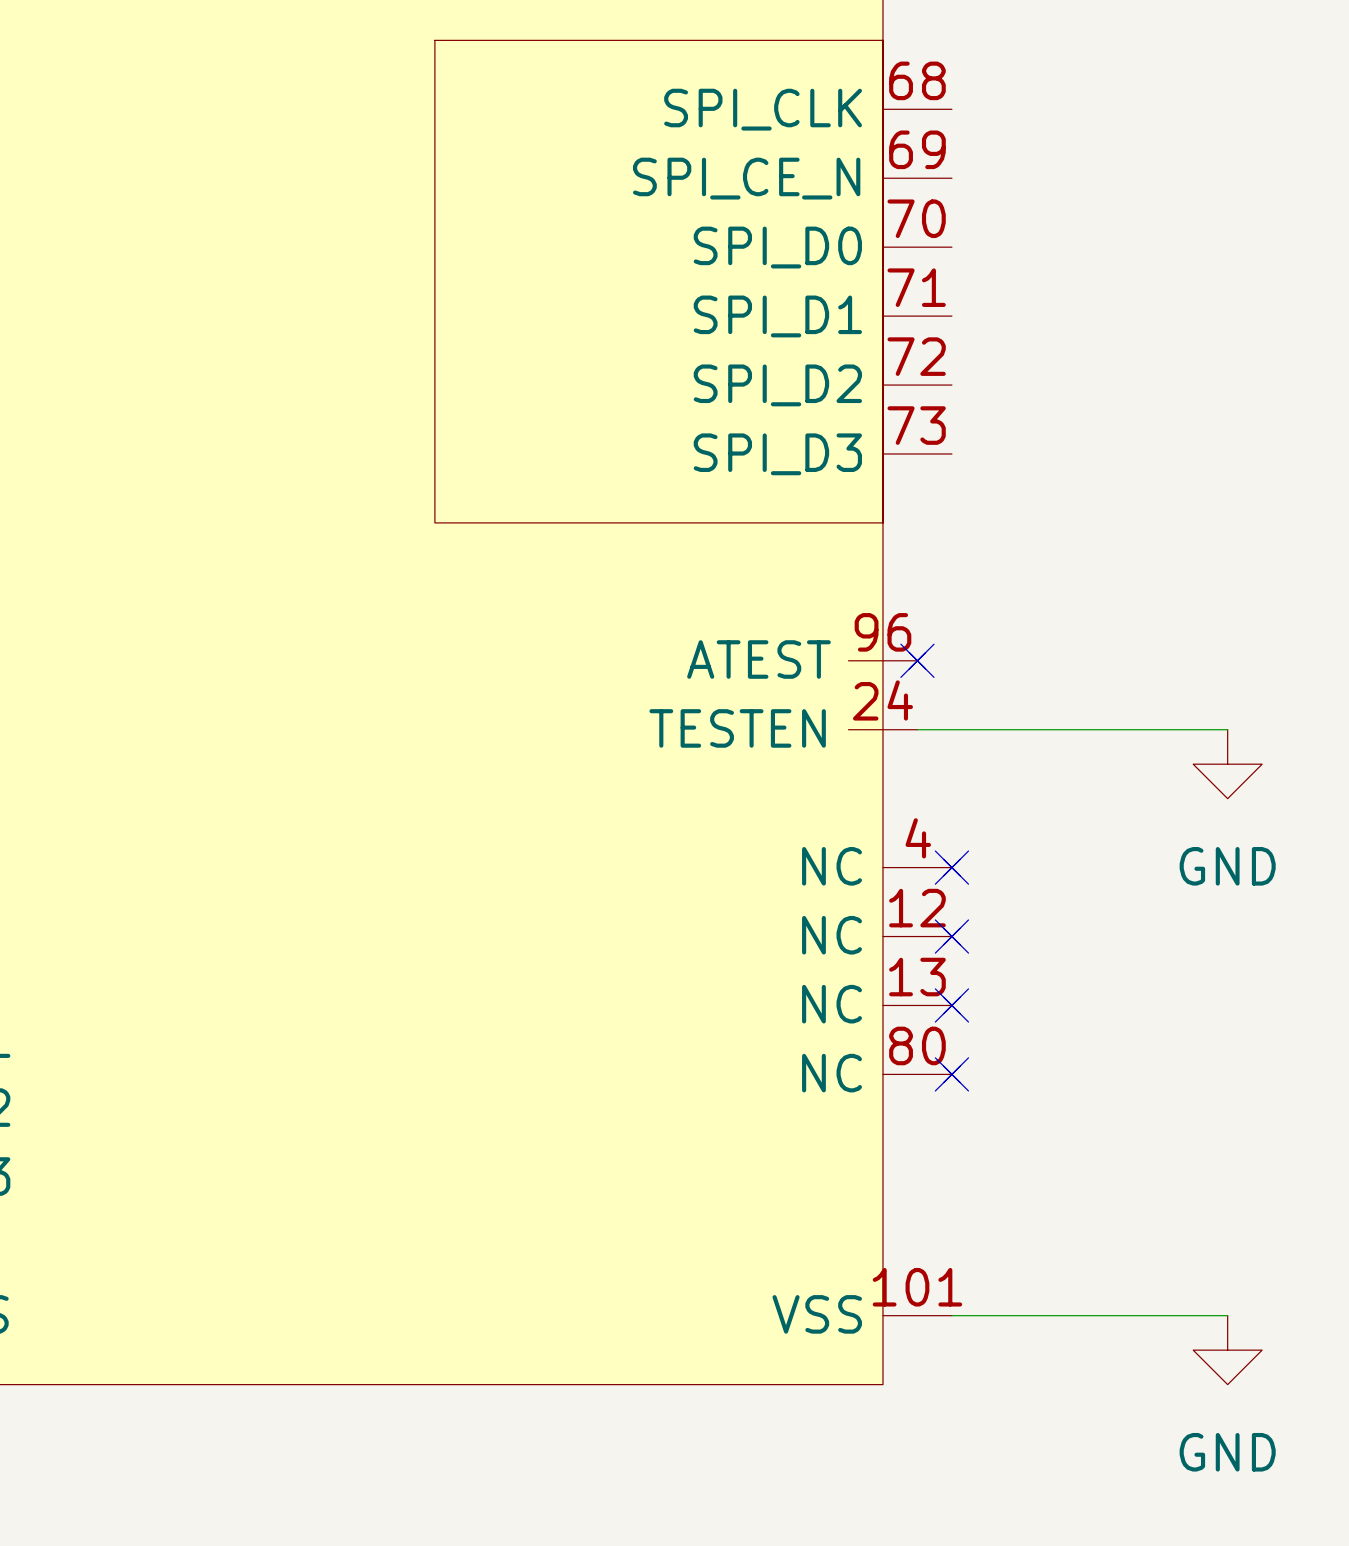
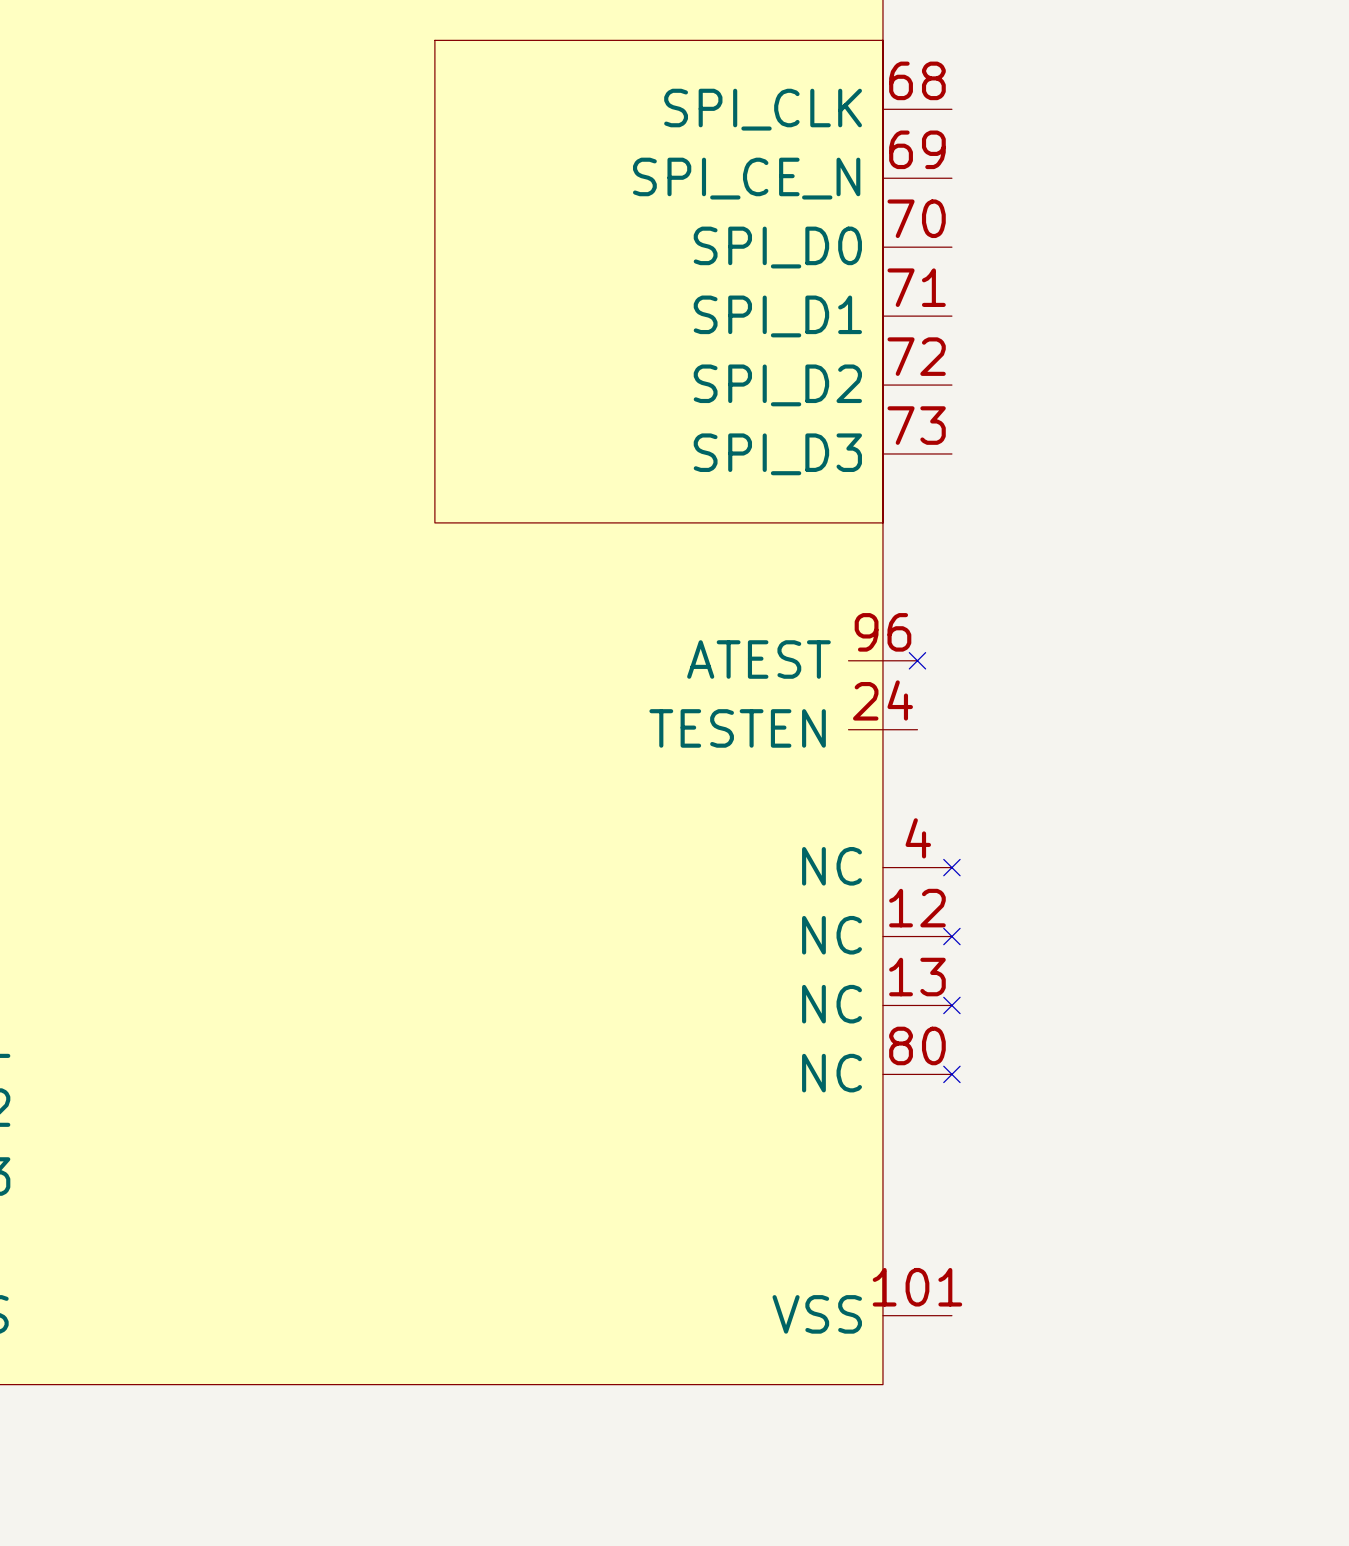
no-connect mark: (917, 660) -> none
wire: (917, 729) (1227, 729) -> none
power symbol: GND (1227, 764) -> none
no-connect mark: (951, 867) -> none
no-connect mark: (951, 936) -> none
no-connect mark: (951, 1005) -> none
no-connect mark: (951, 1074) -> none
wire: (951, 1315) (1227, 1315) -> none
power symbol: GND (1227, 1350) -> none

